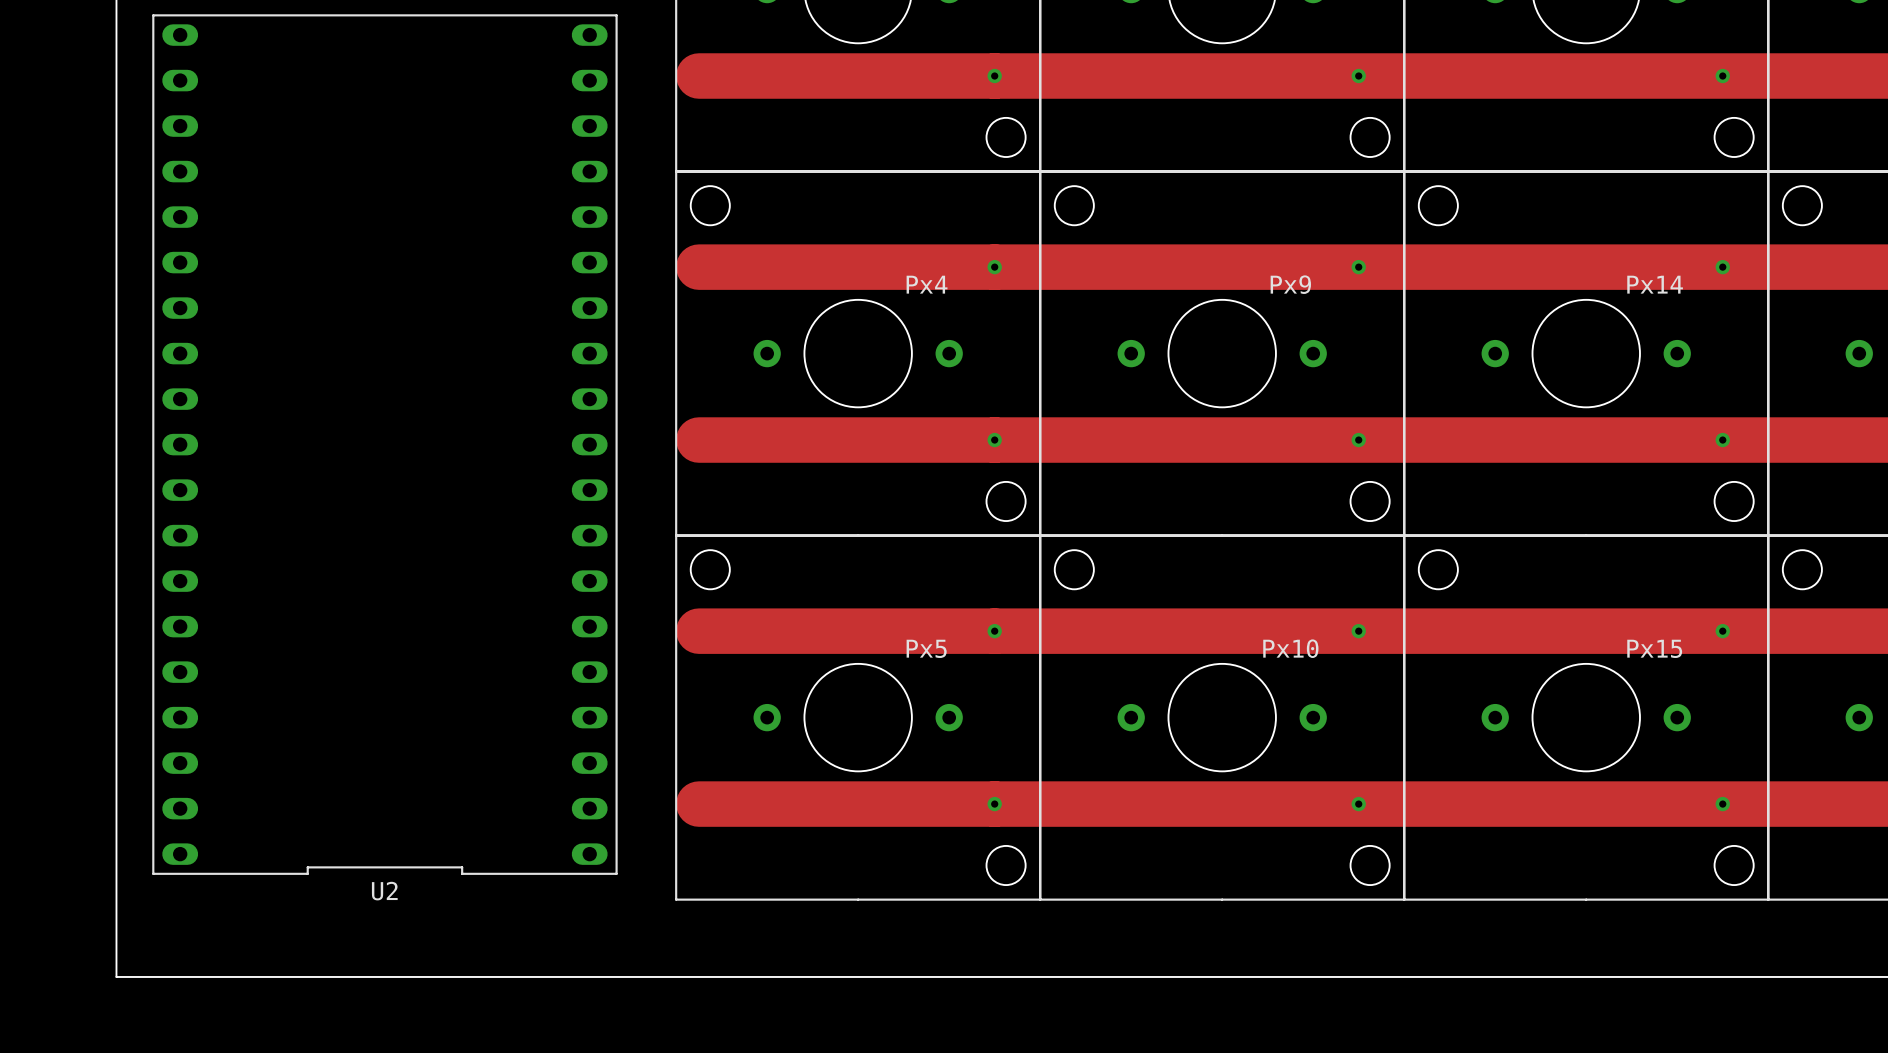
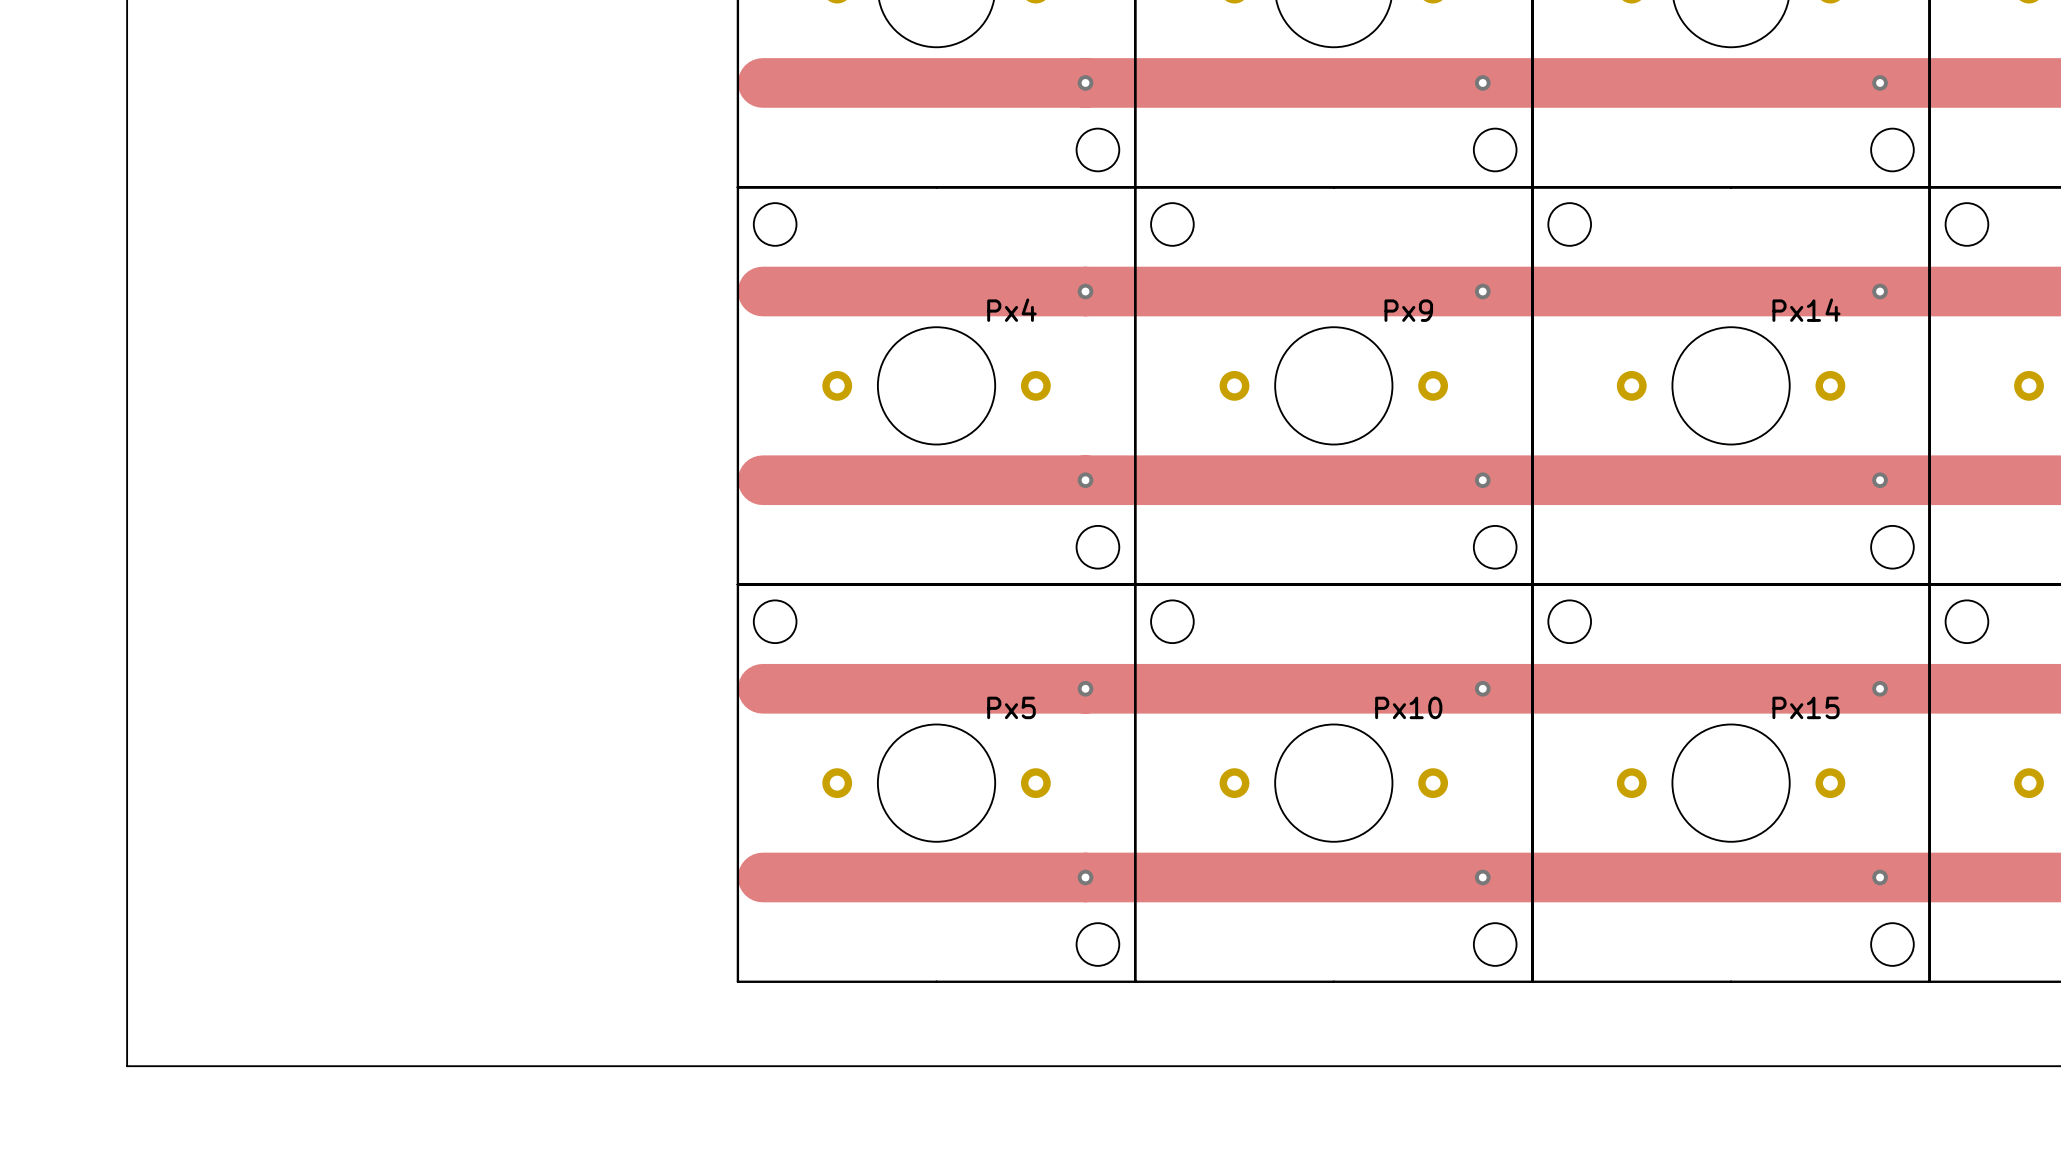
U2: (384, 444) -> none

